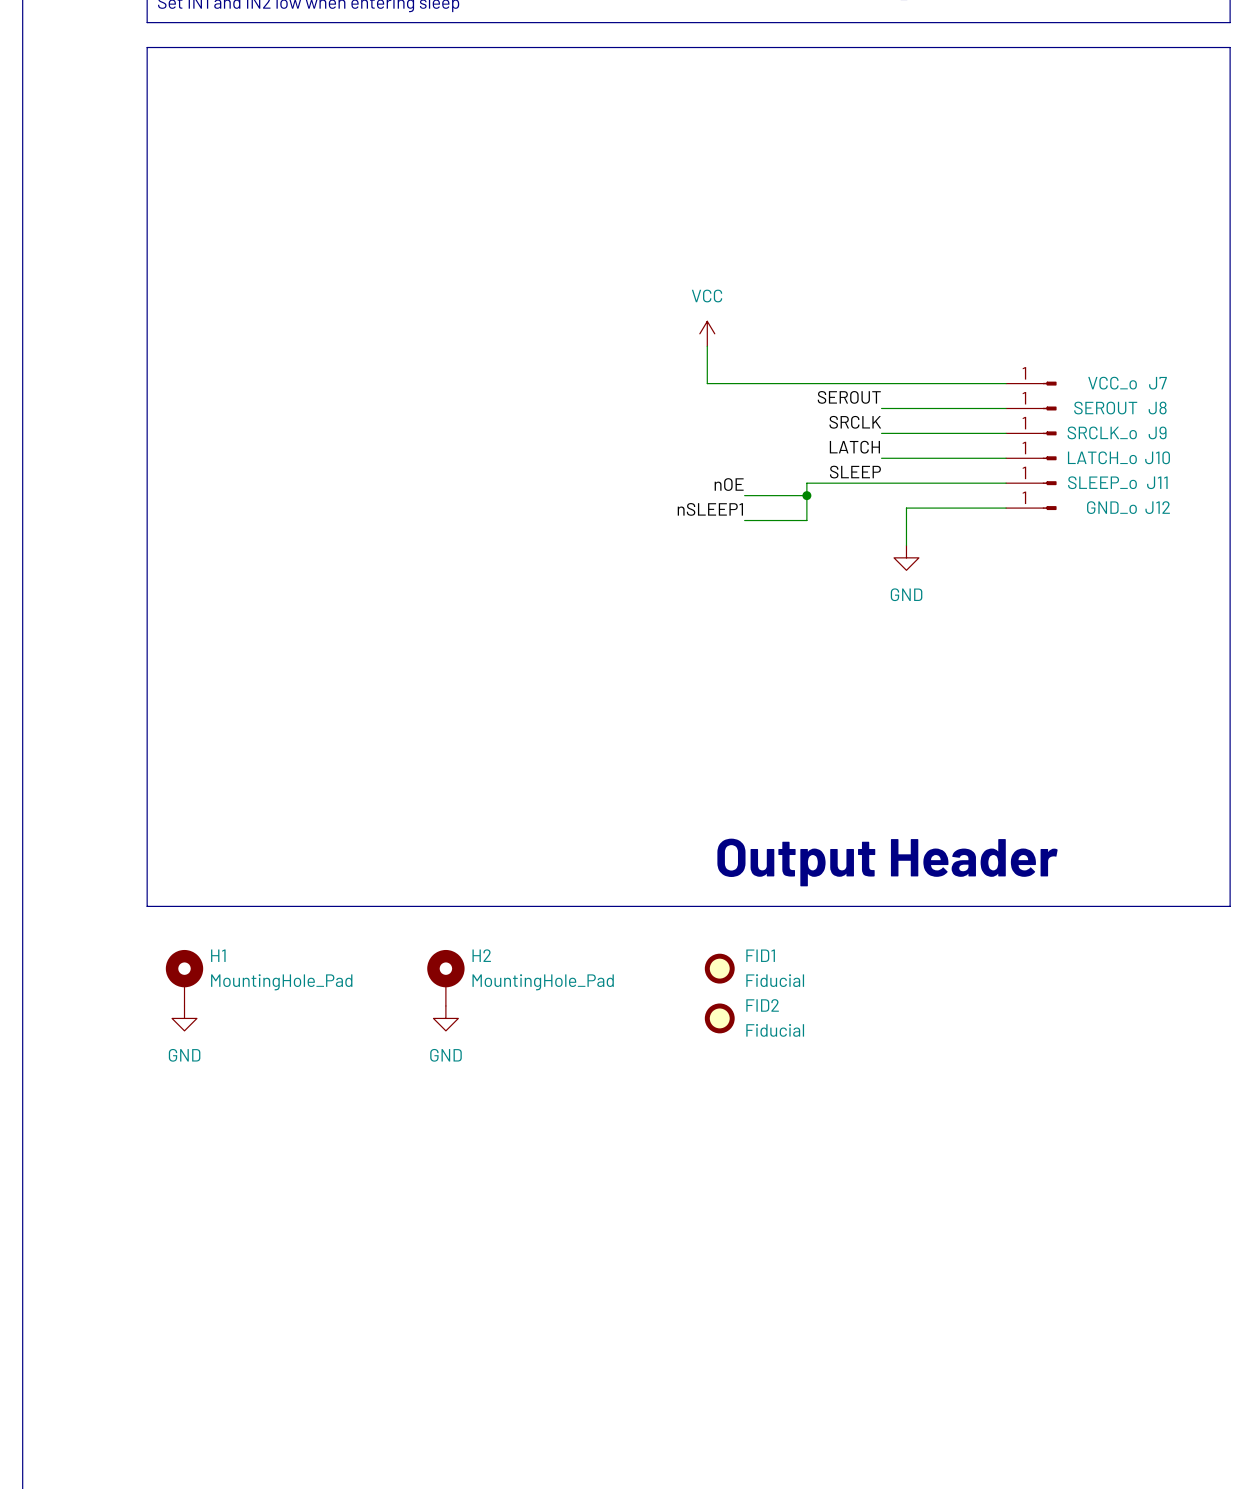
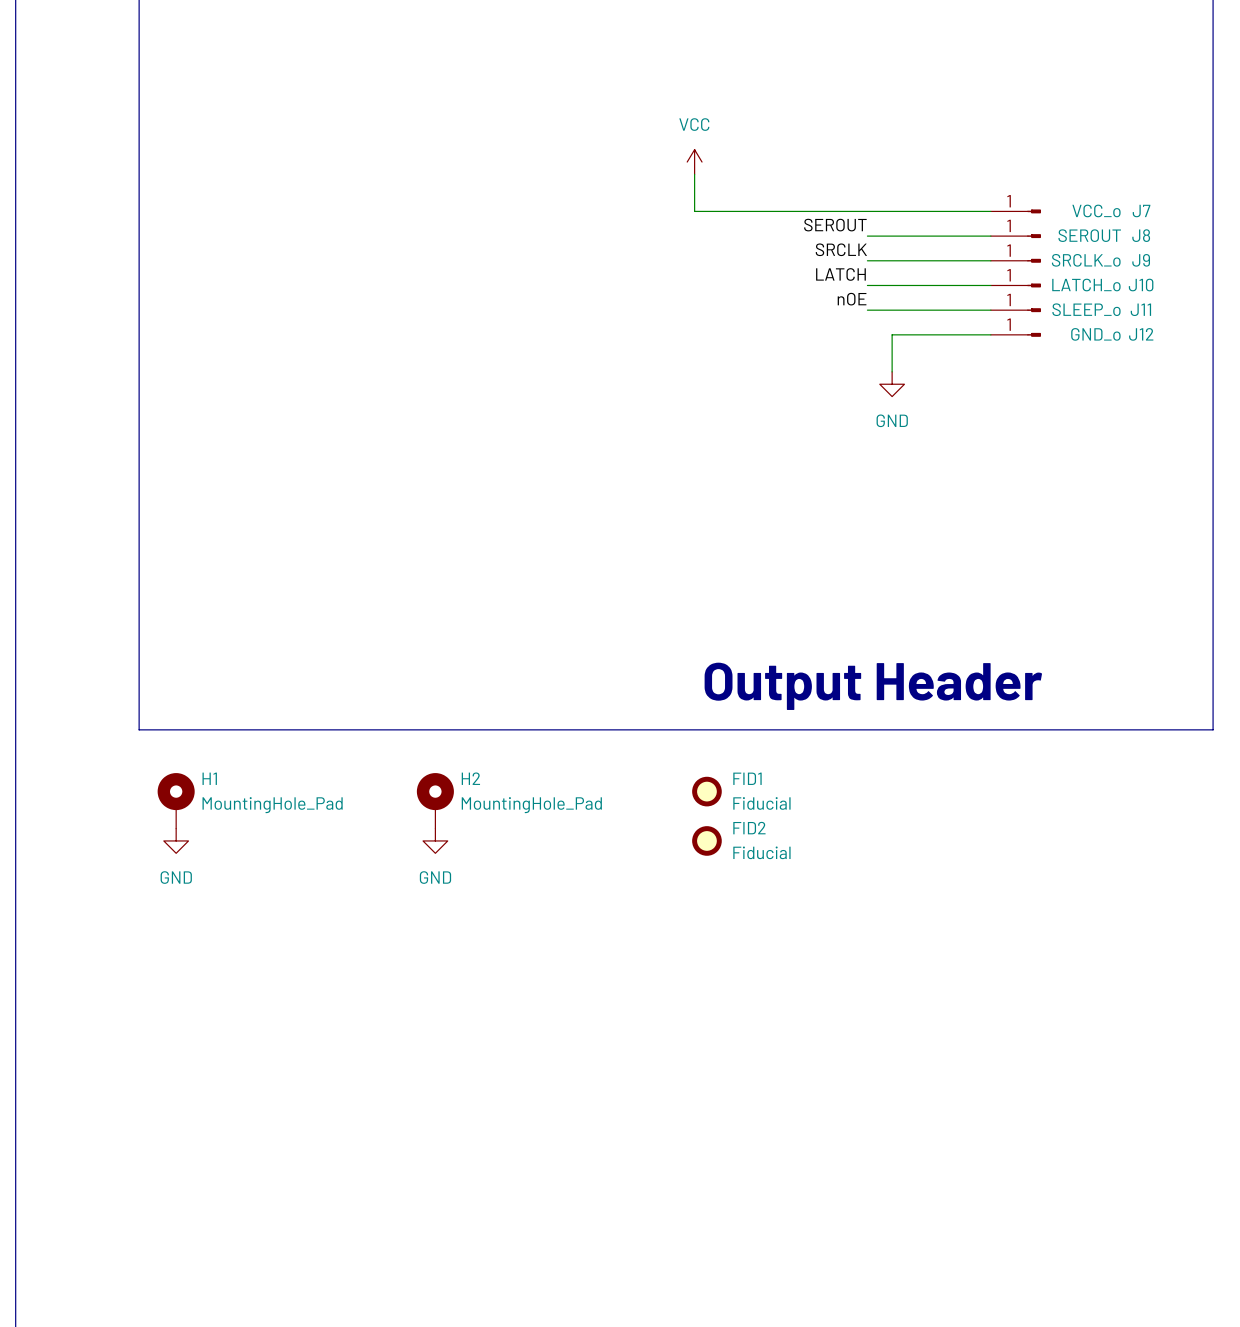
label: SLEEP (855, 472) -> nOE (852, 299)
wire: (881, 483) (806, 483) (806, 520) (744, 520) -> none
label: nOE (729, 484) -> none
wire: (744, 495) (806, 495) -> none
junction: (806, 495) -> none
label: nSLEEP1 (710, 509) -> none

